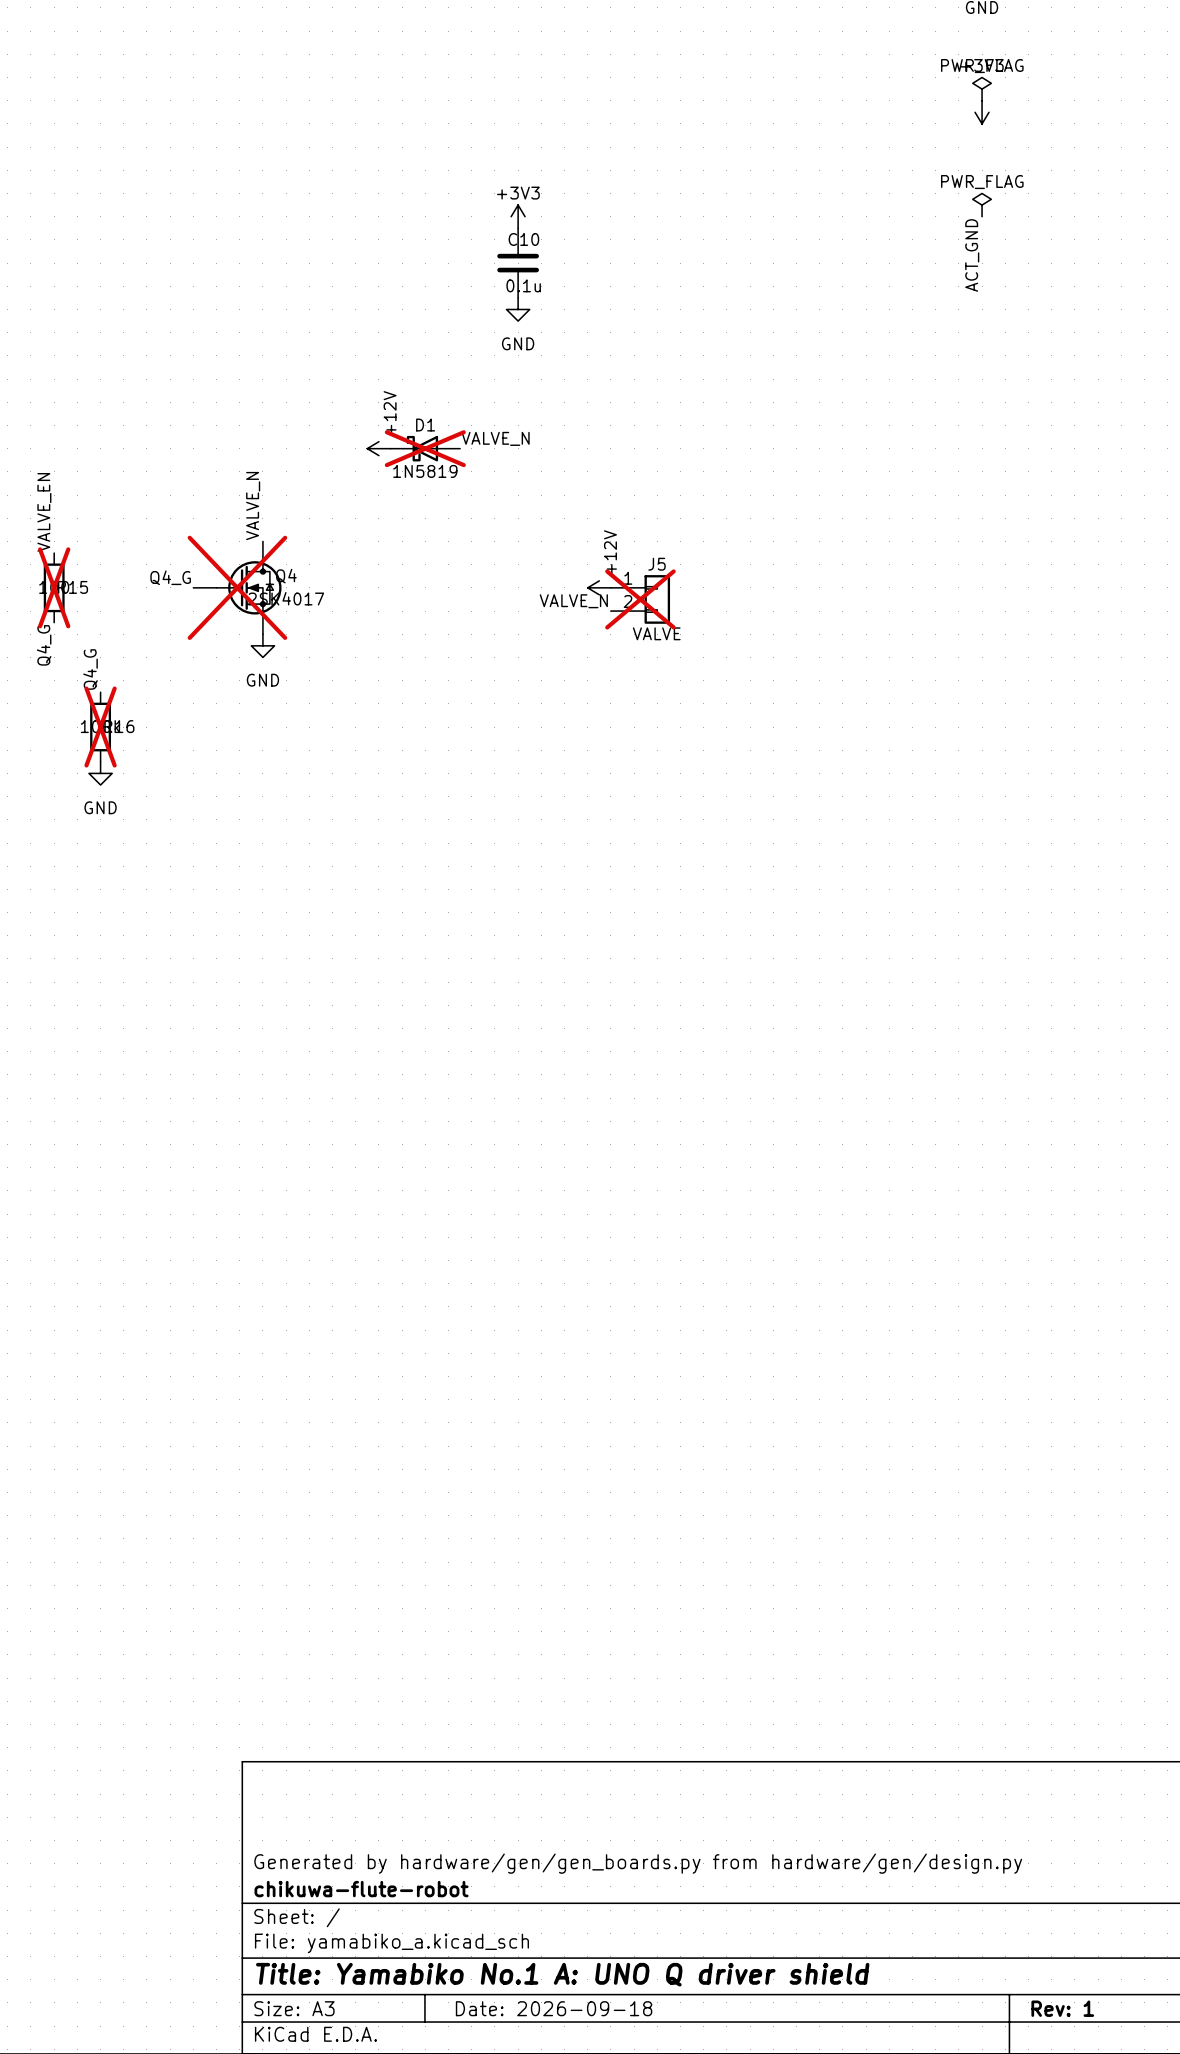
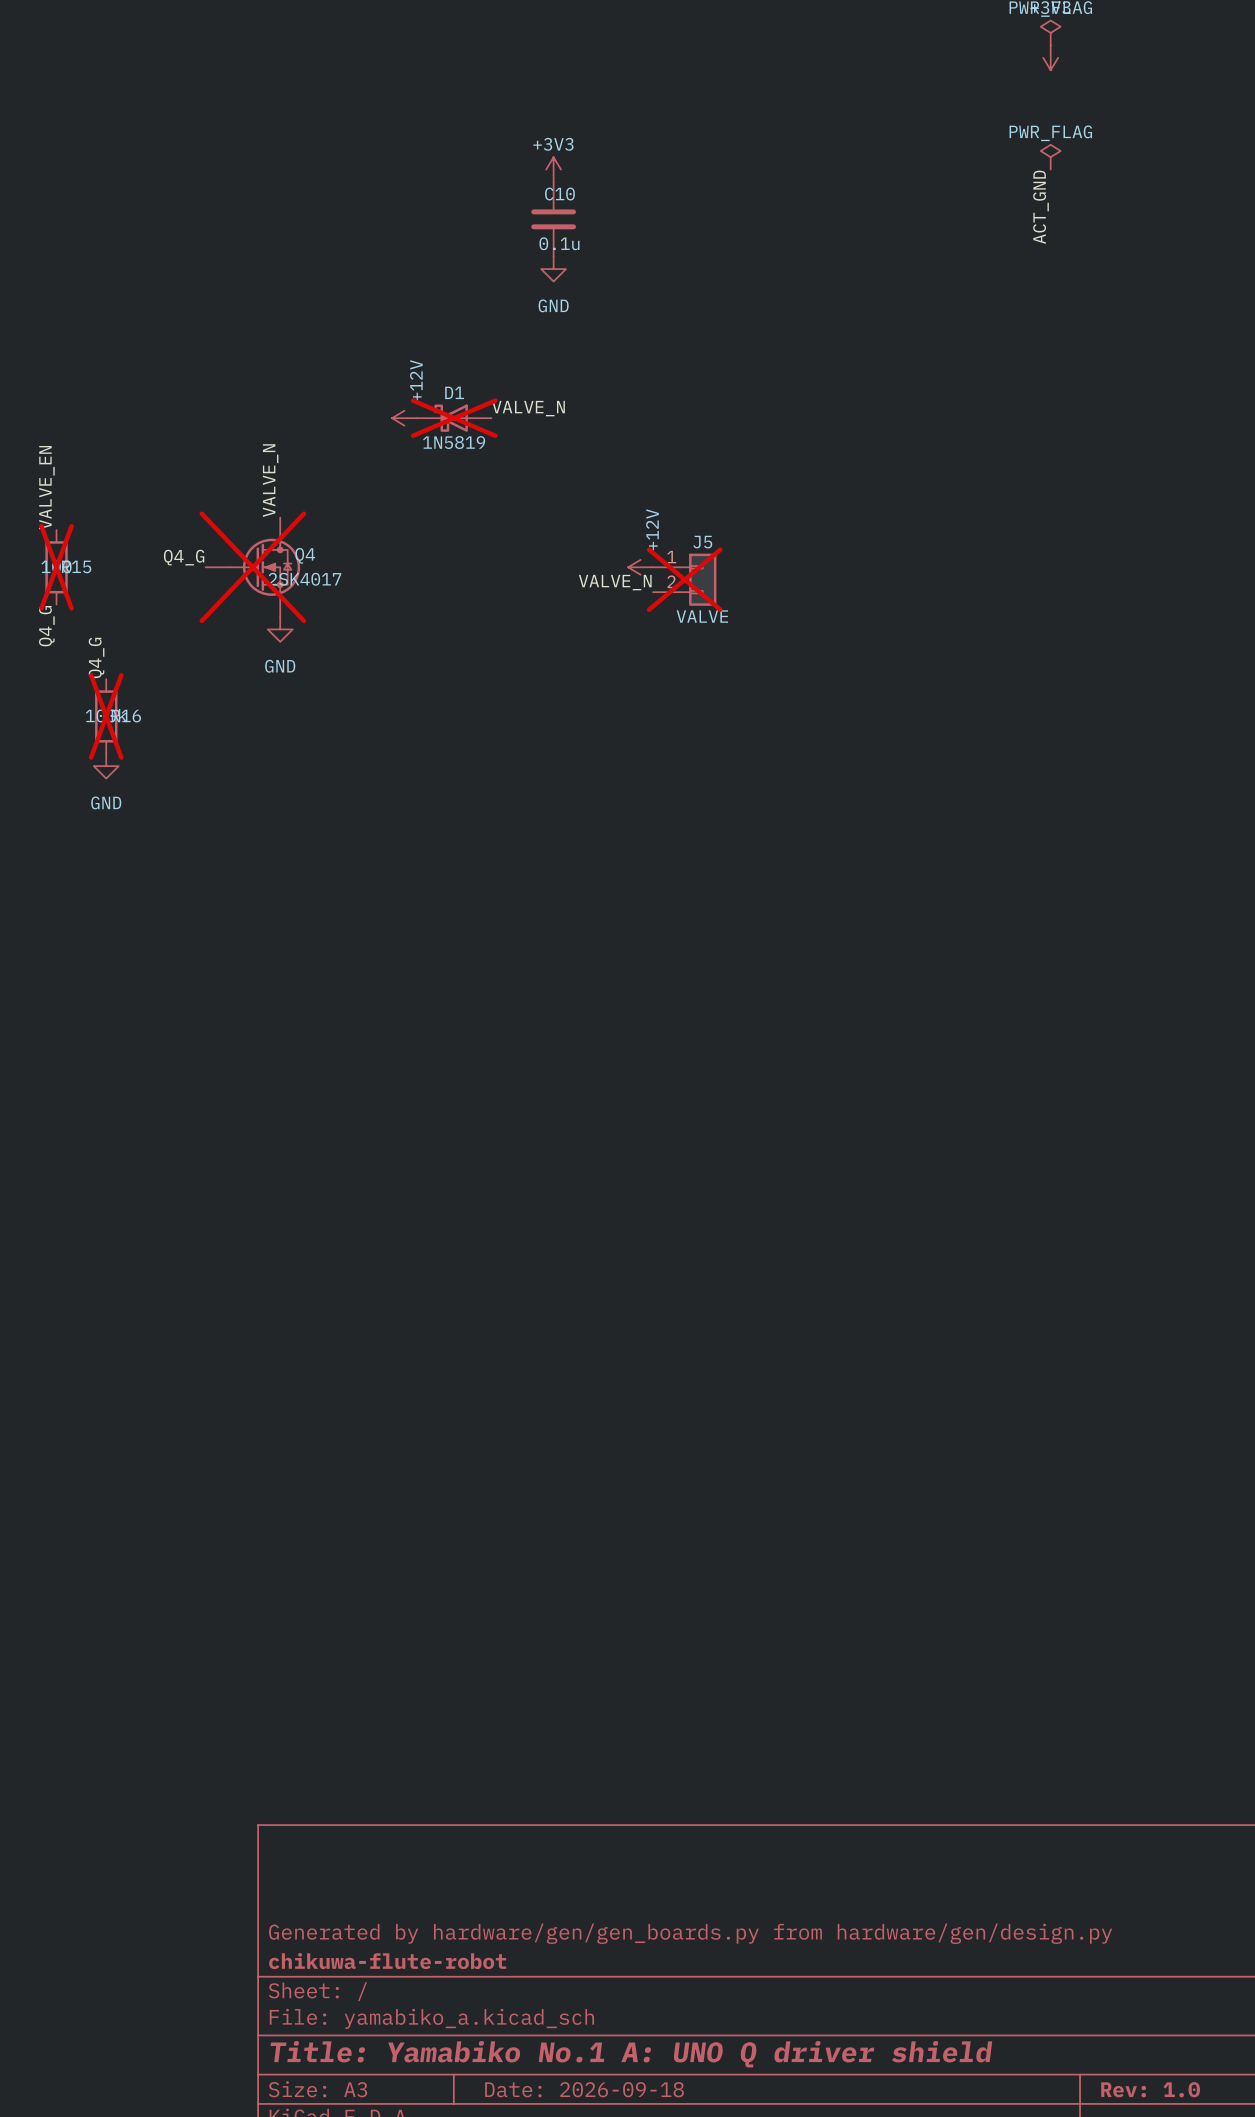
title block: Rev: 1 (1062, 2008) -> Rev: 1.0 (1150, 2089)

